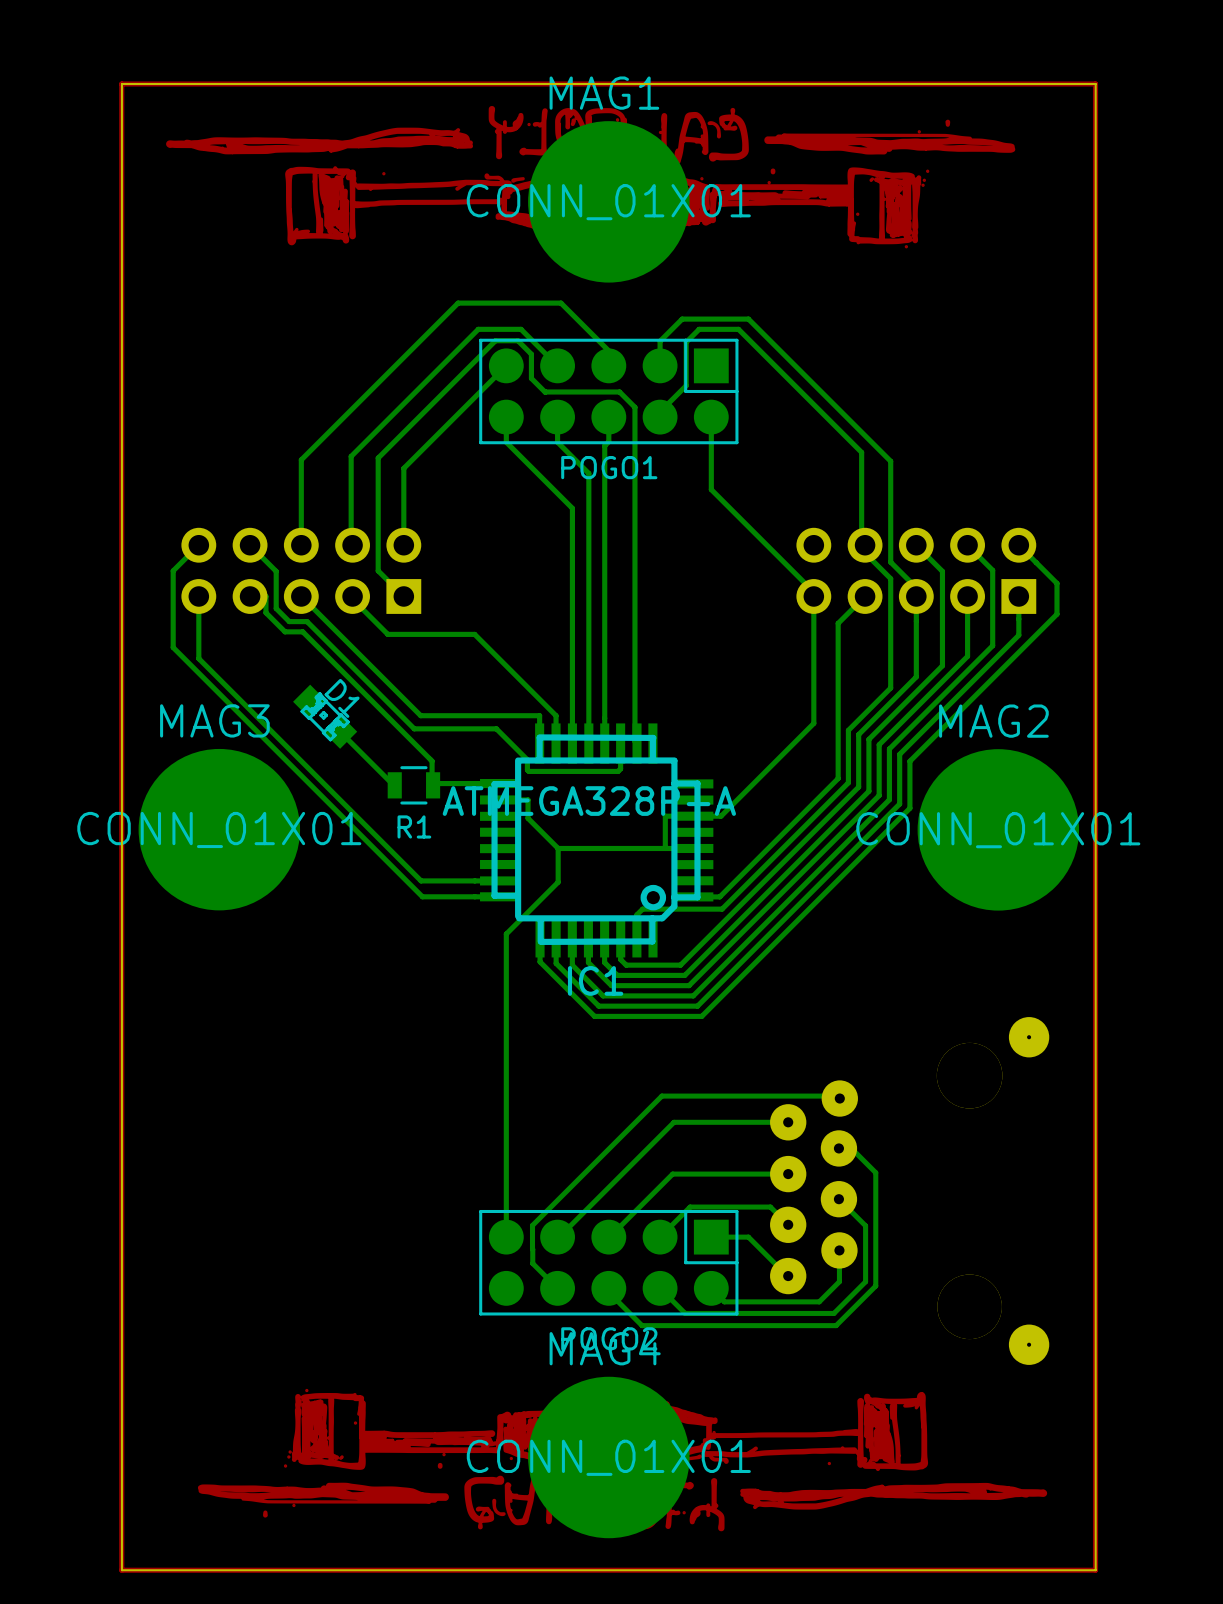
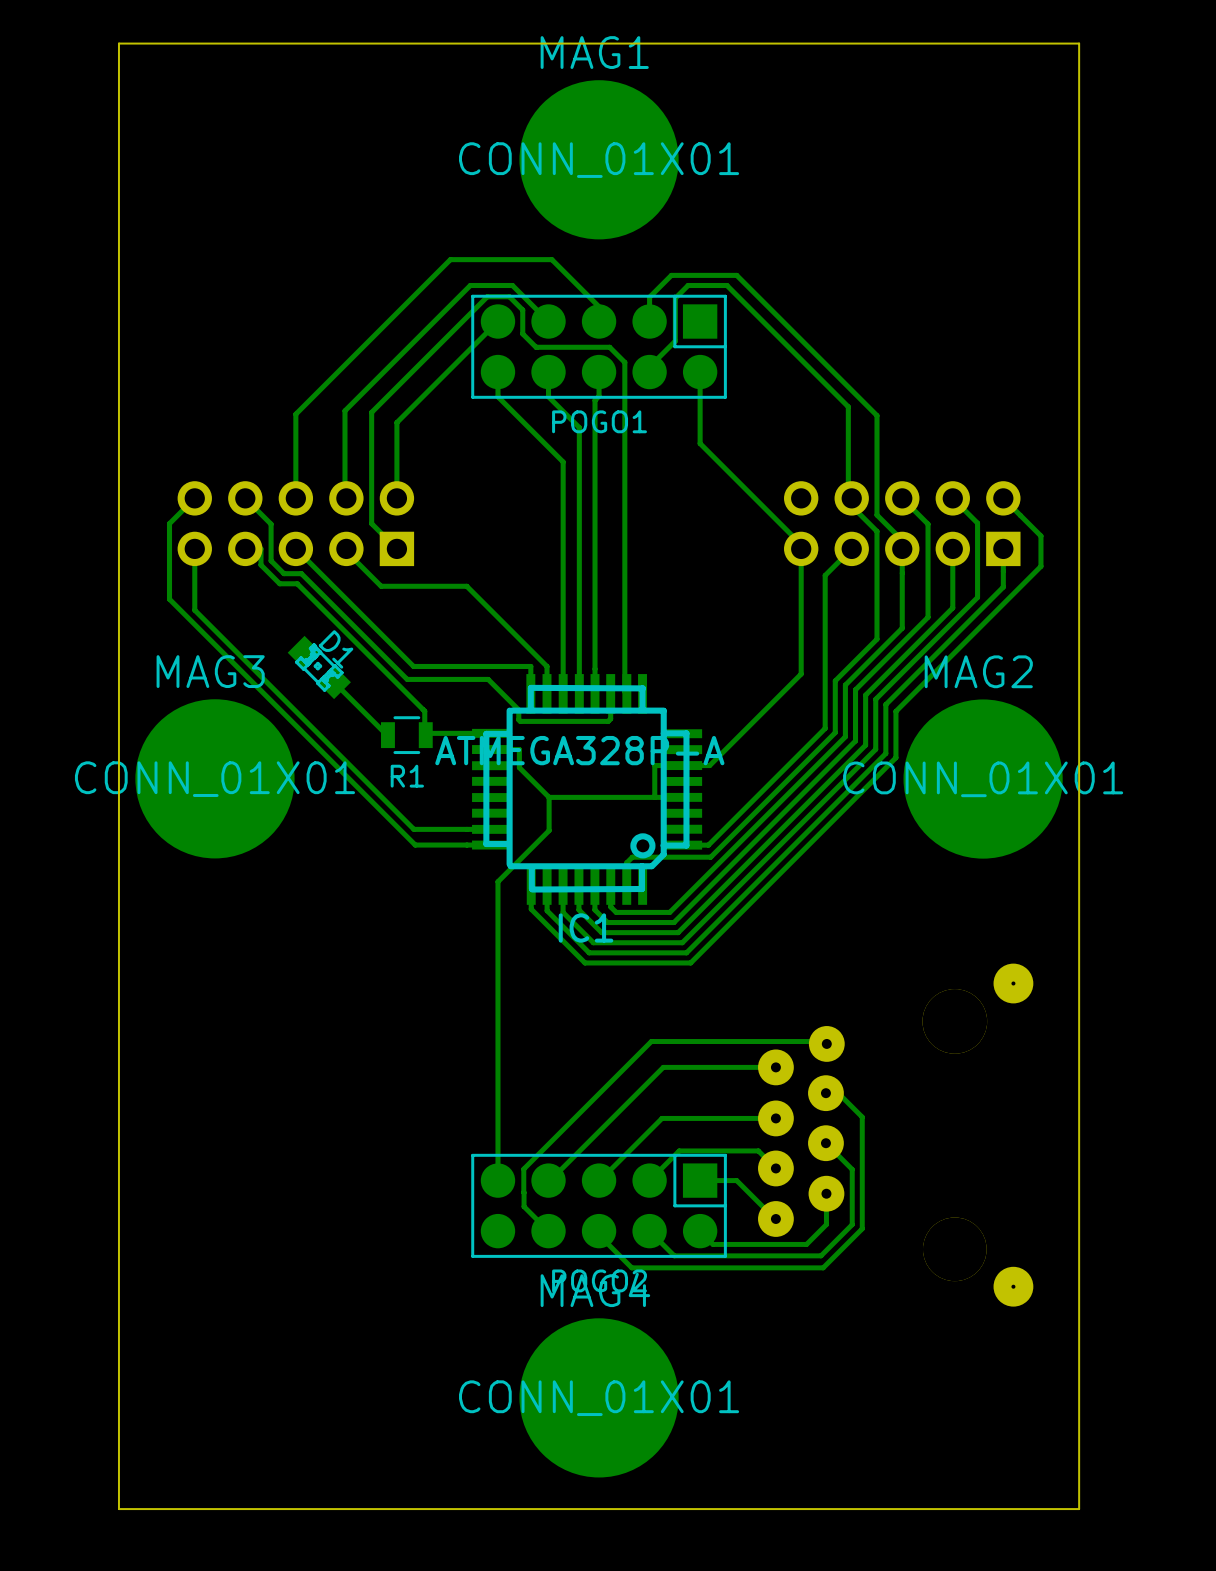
top track: (1095, 83) (121, 83) (121, 1570) (1095, 1570) (1095, 83) -> none
drawing: [166, 106, 1016, 249] -> none
drawing: [197, 1388, 1048, 1532] -> none

